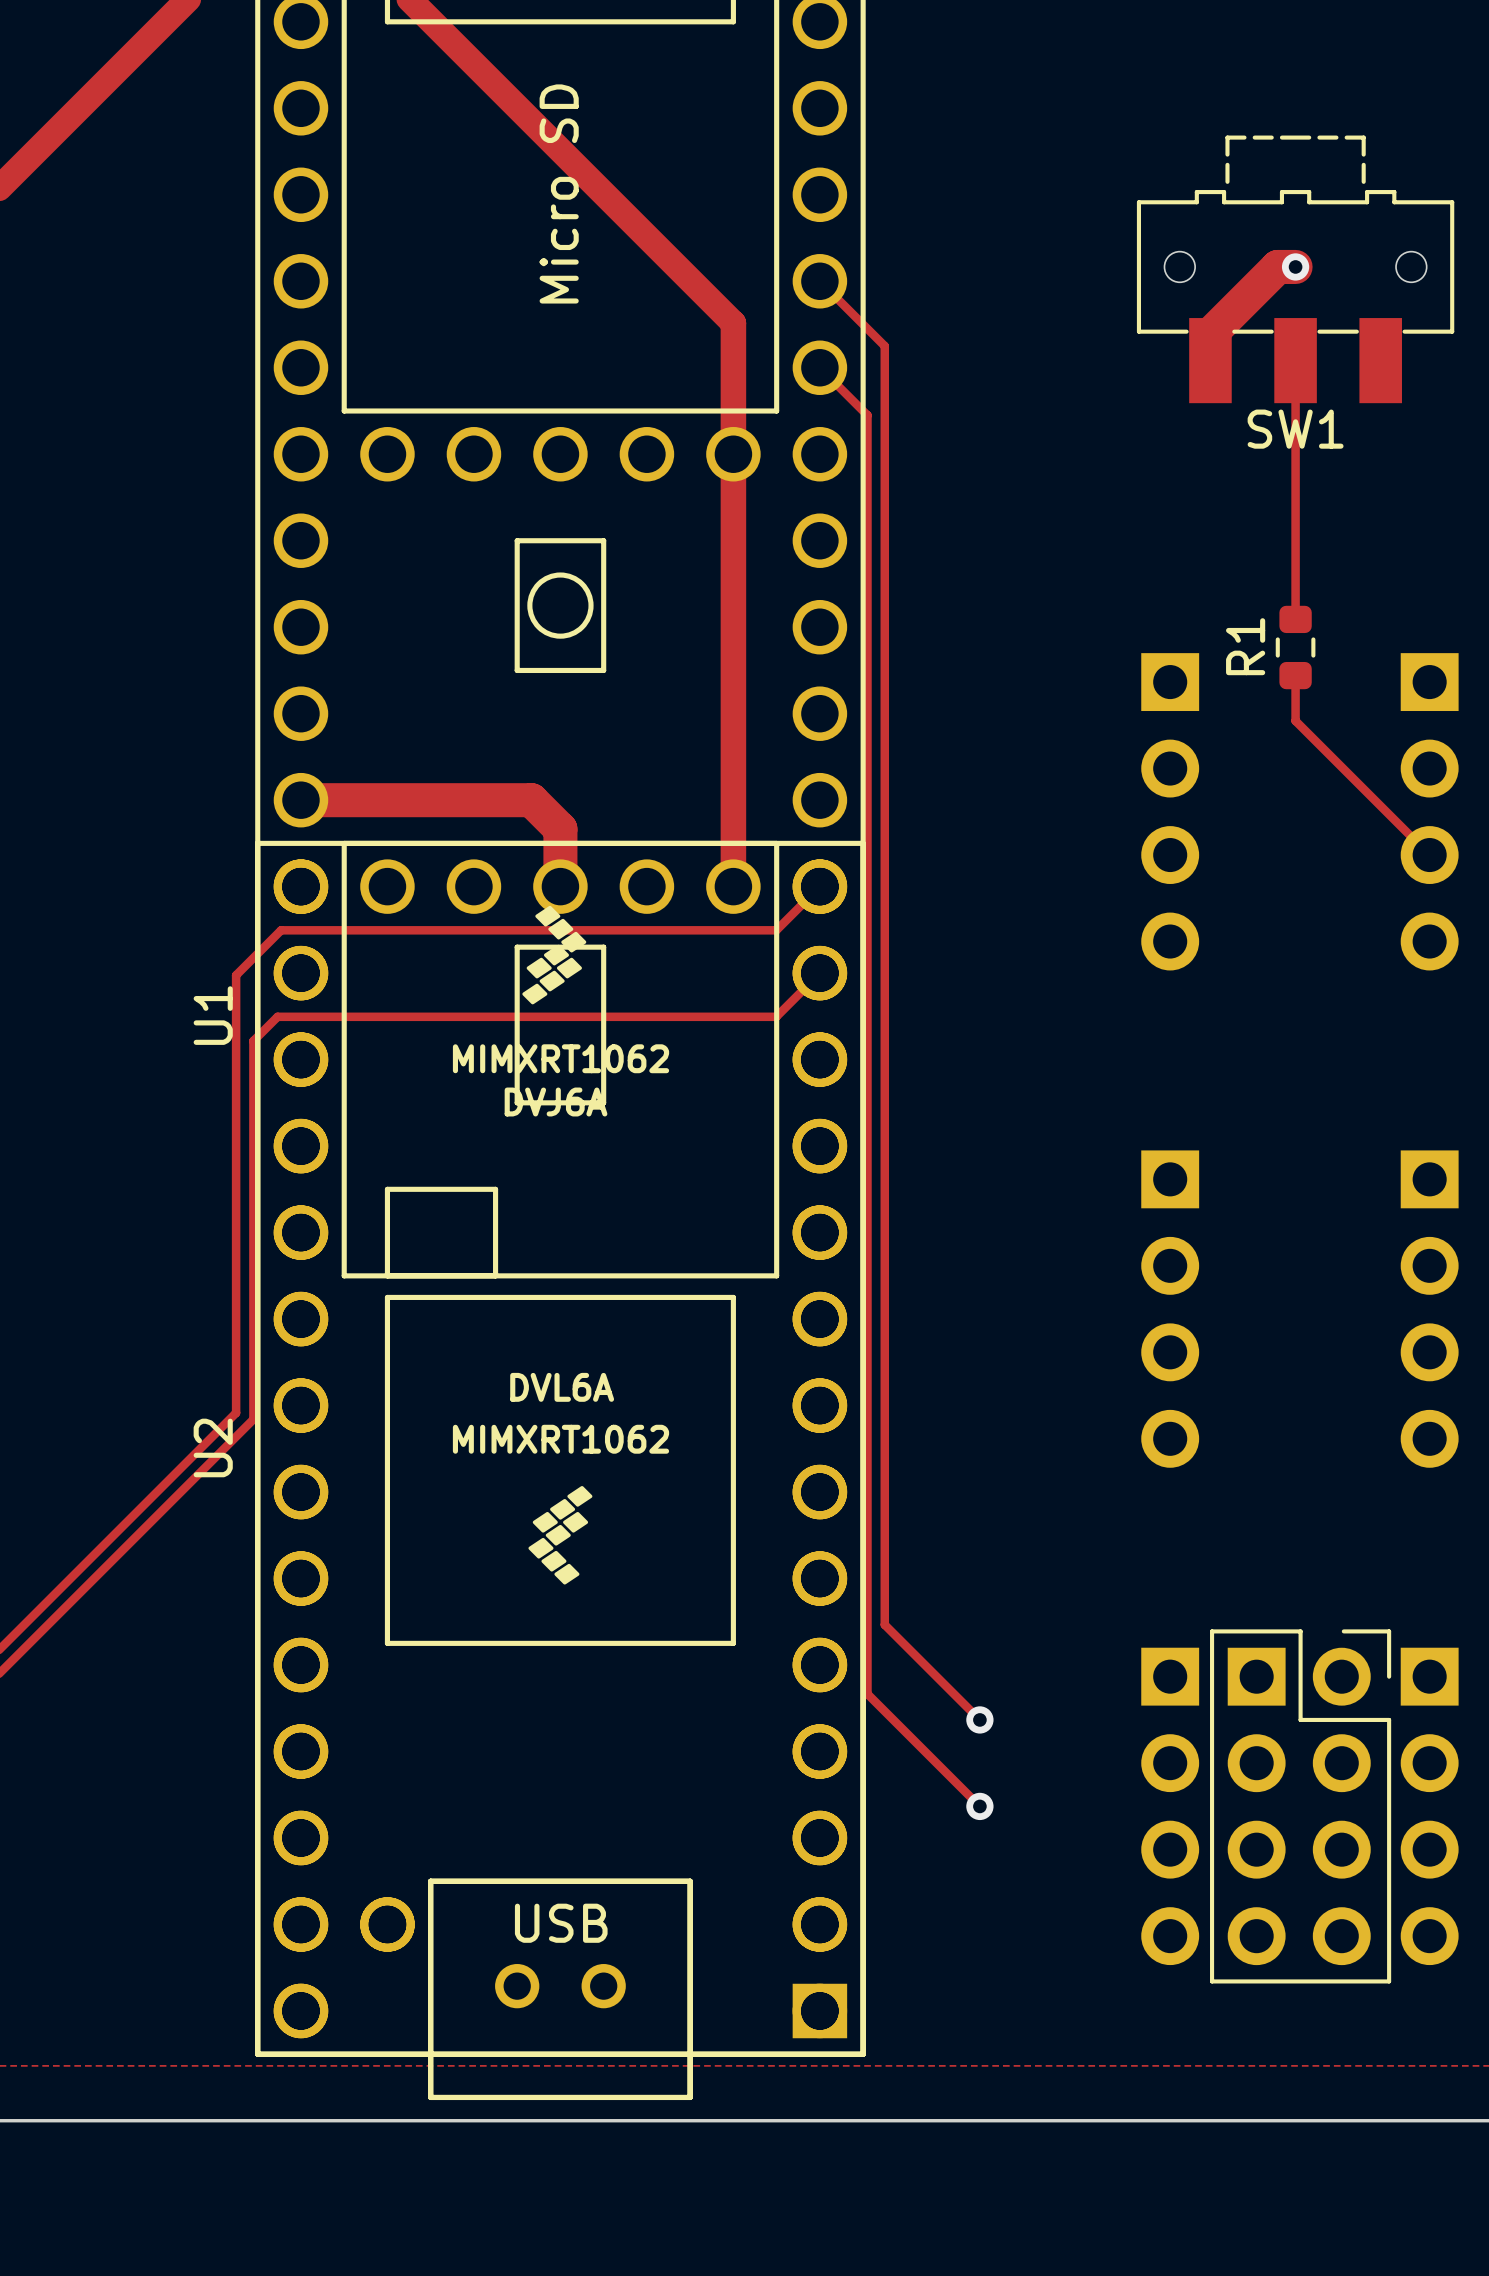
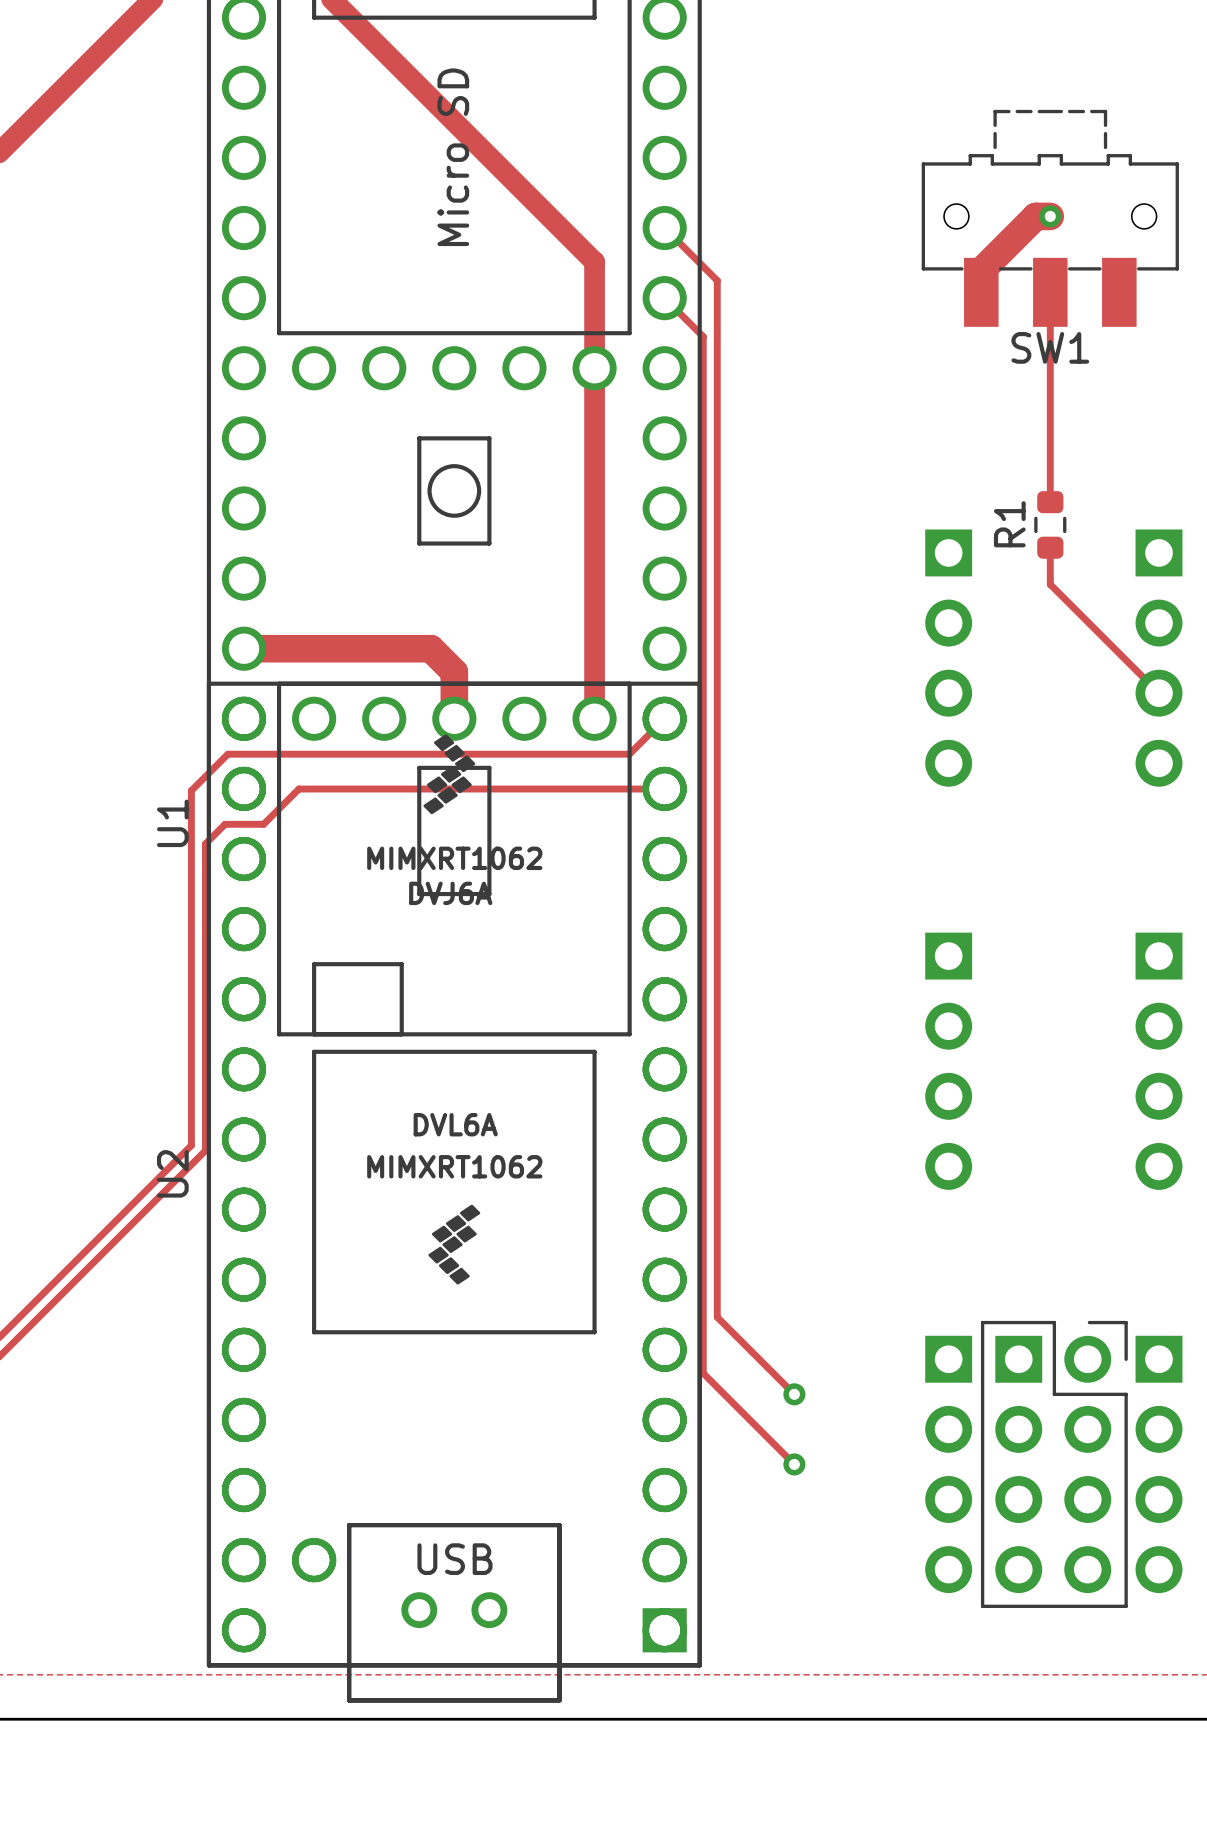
track: (819, 973) (776, 1016) (325, 1016) -> (664, 789) (298, 789) (263, 824)

